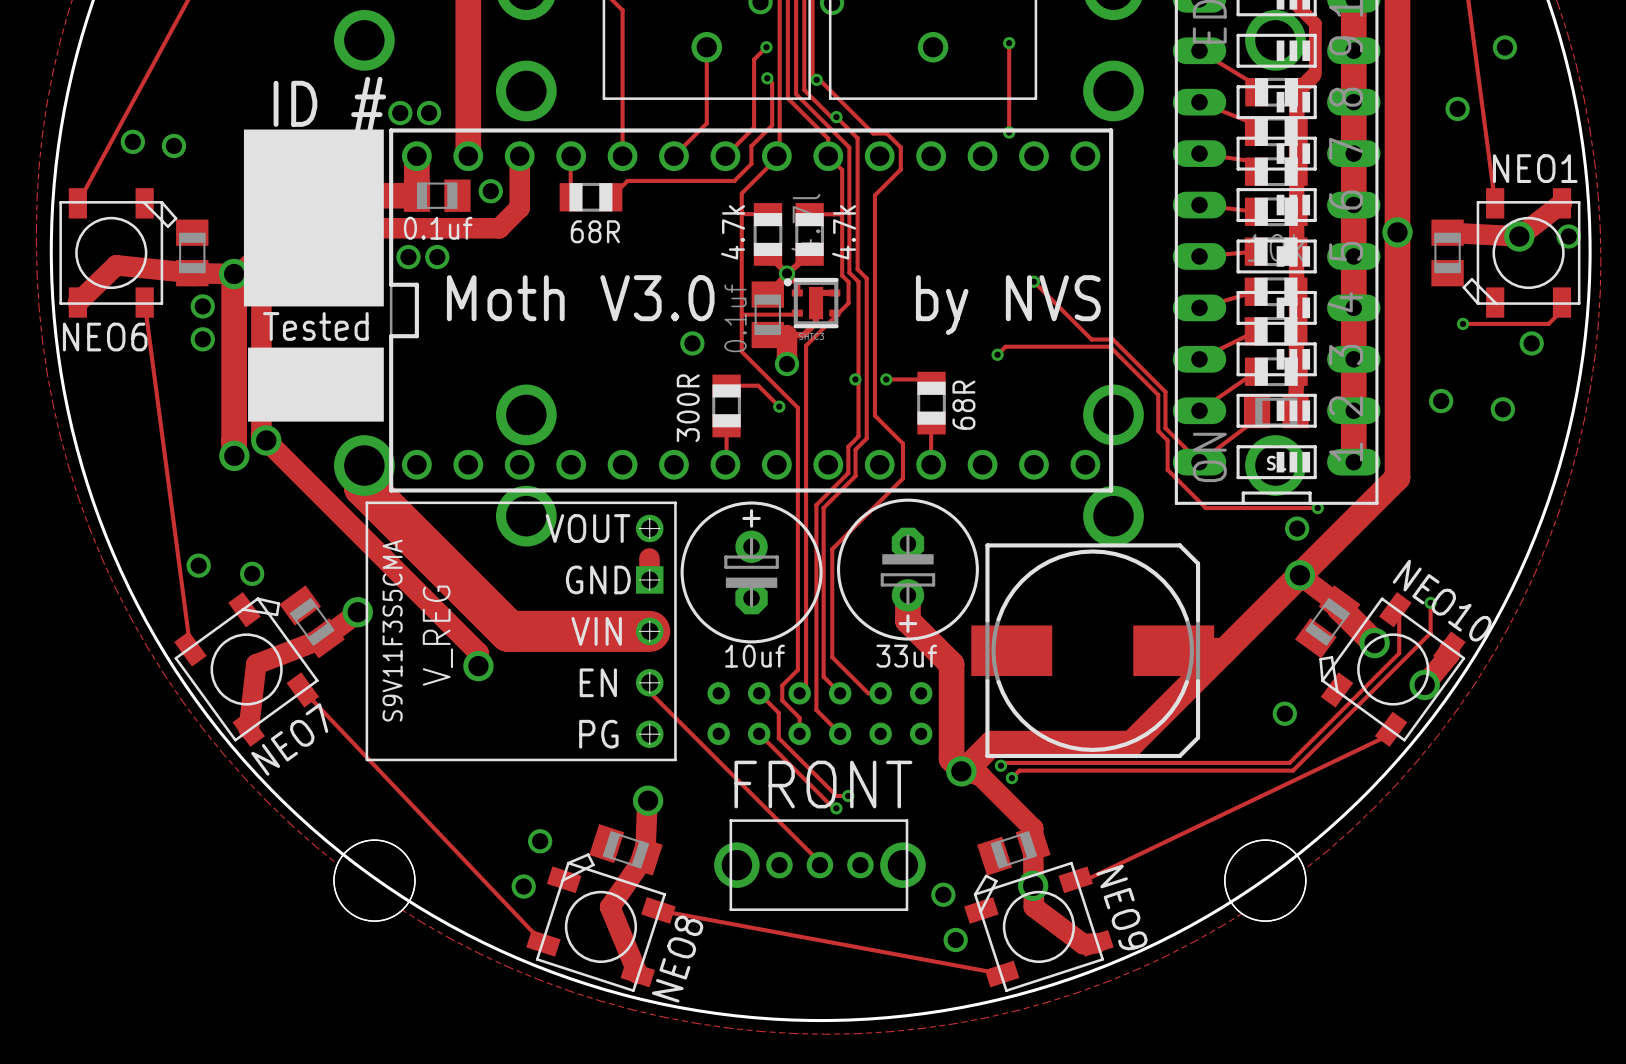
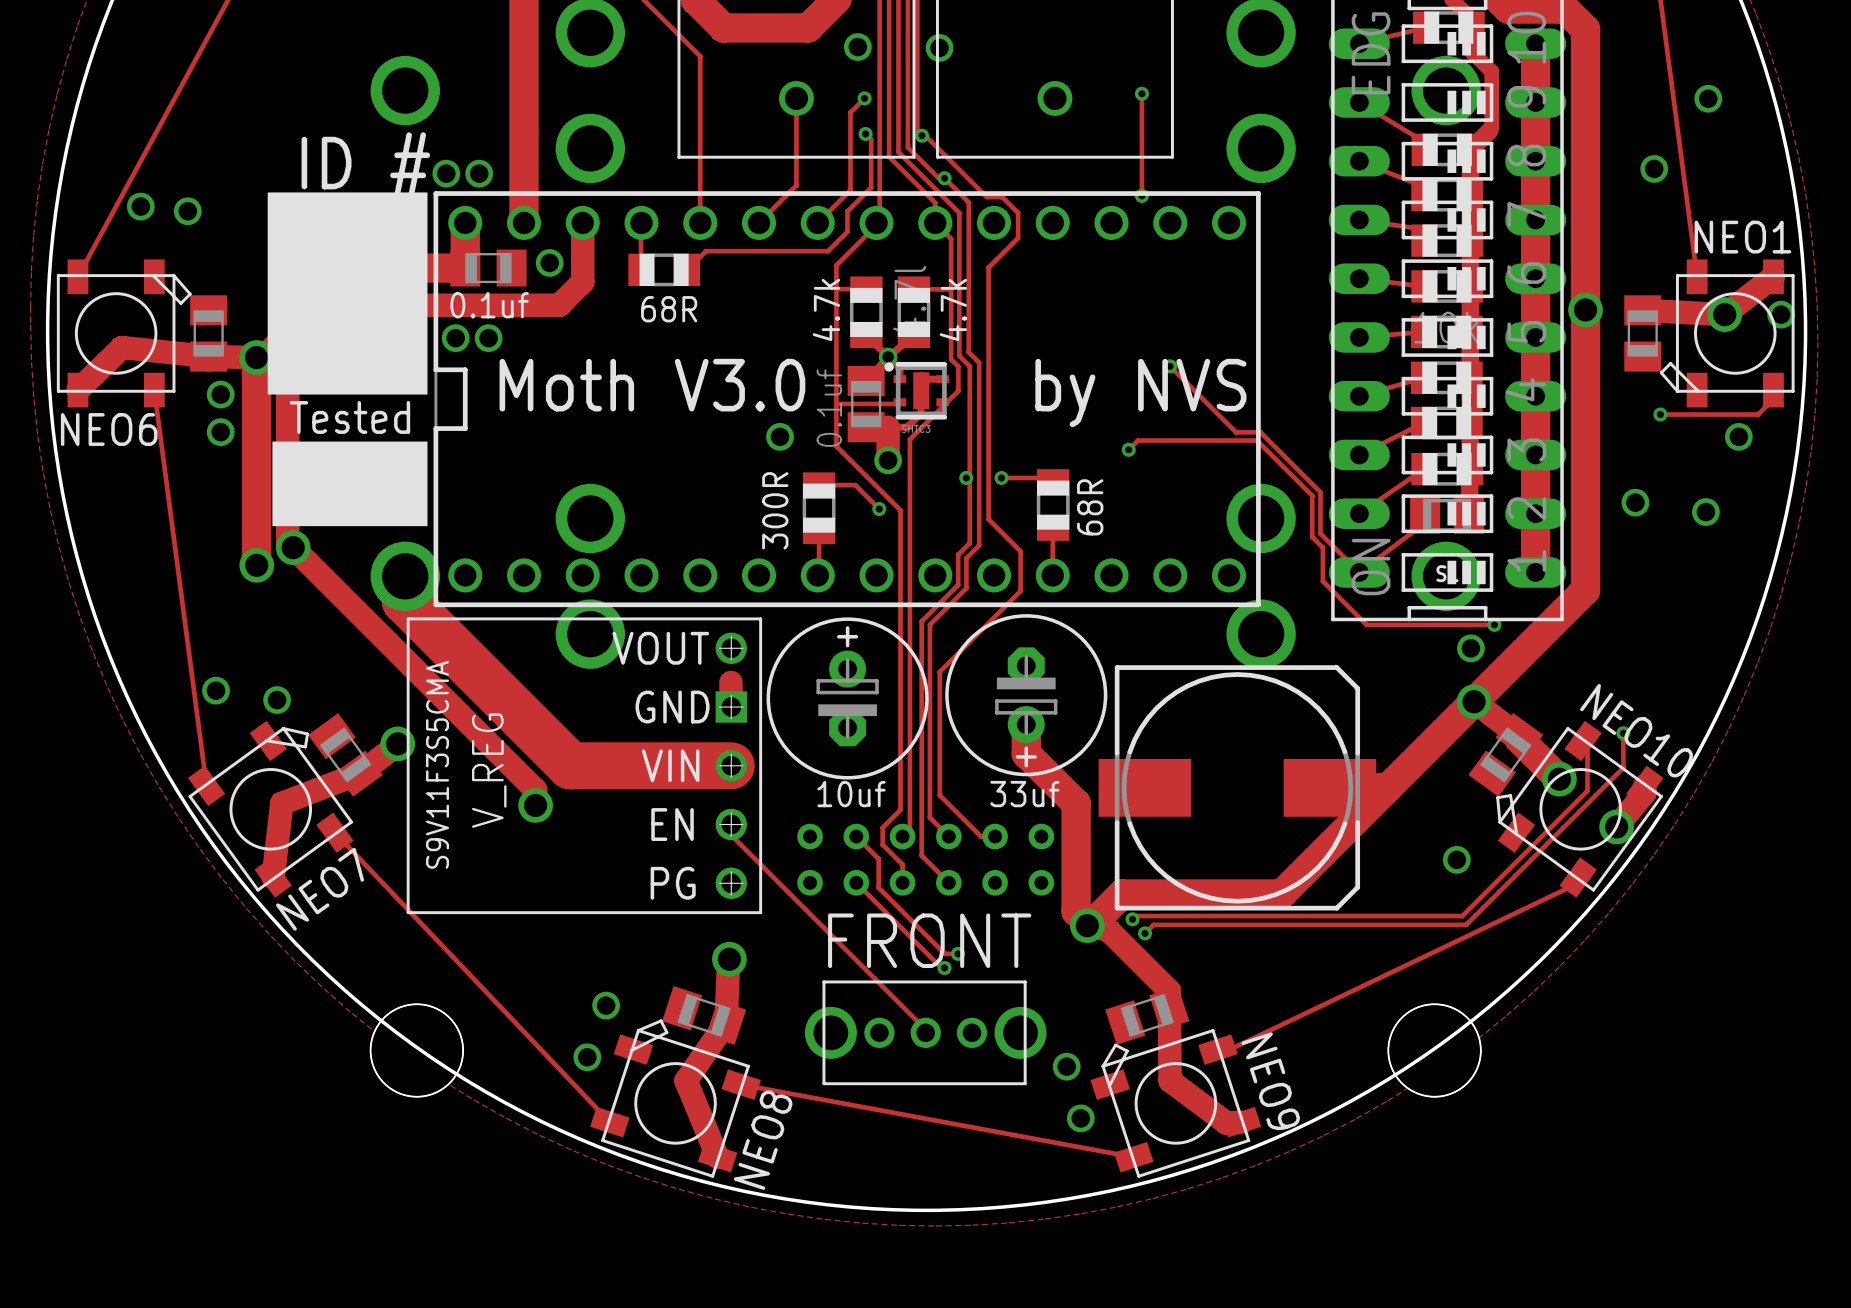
via: (1033, 885) -> none

